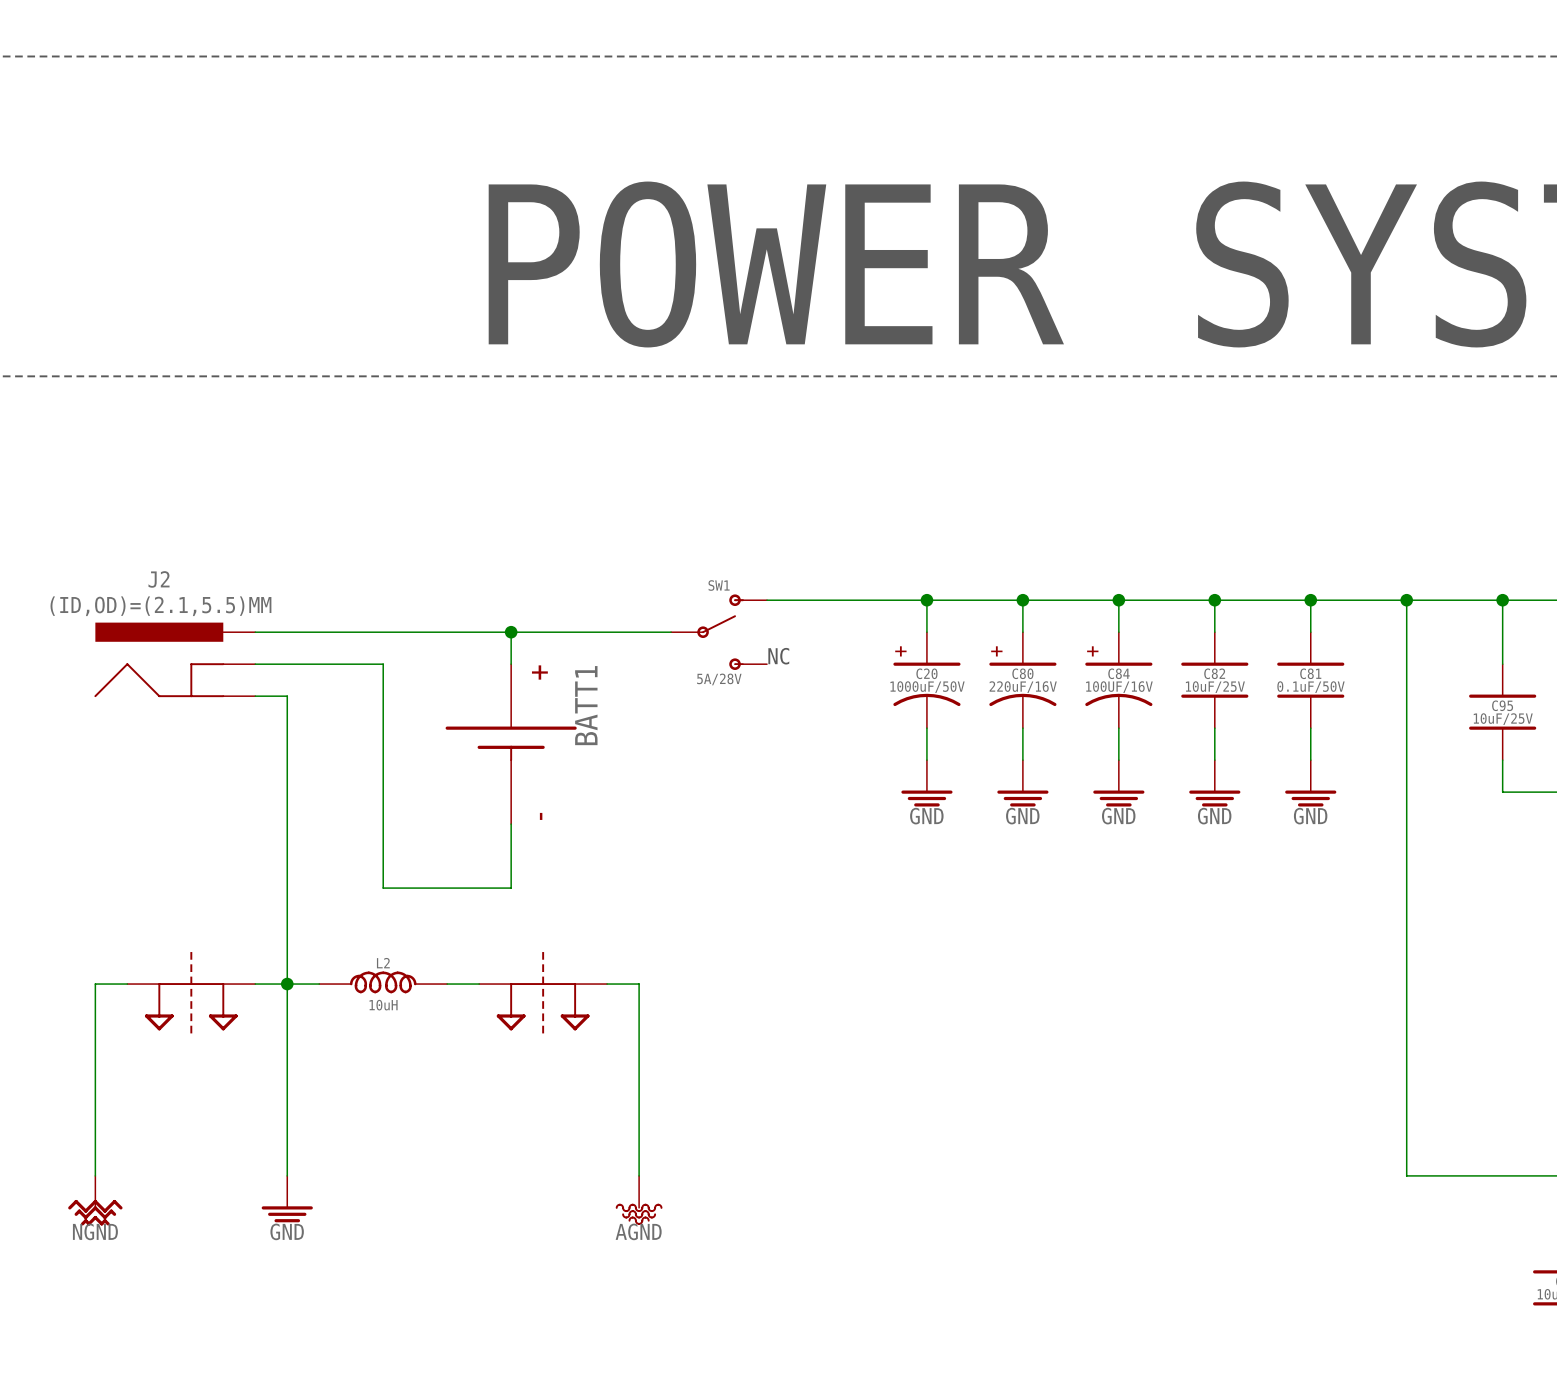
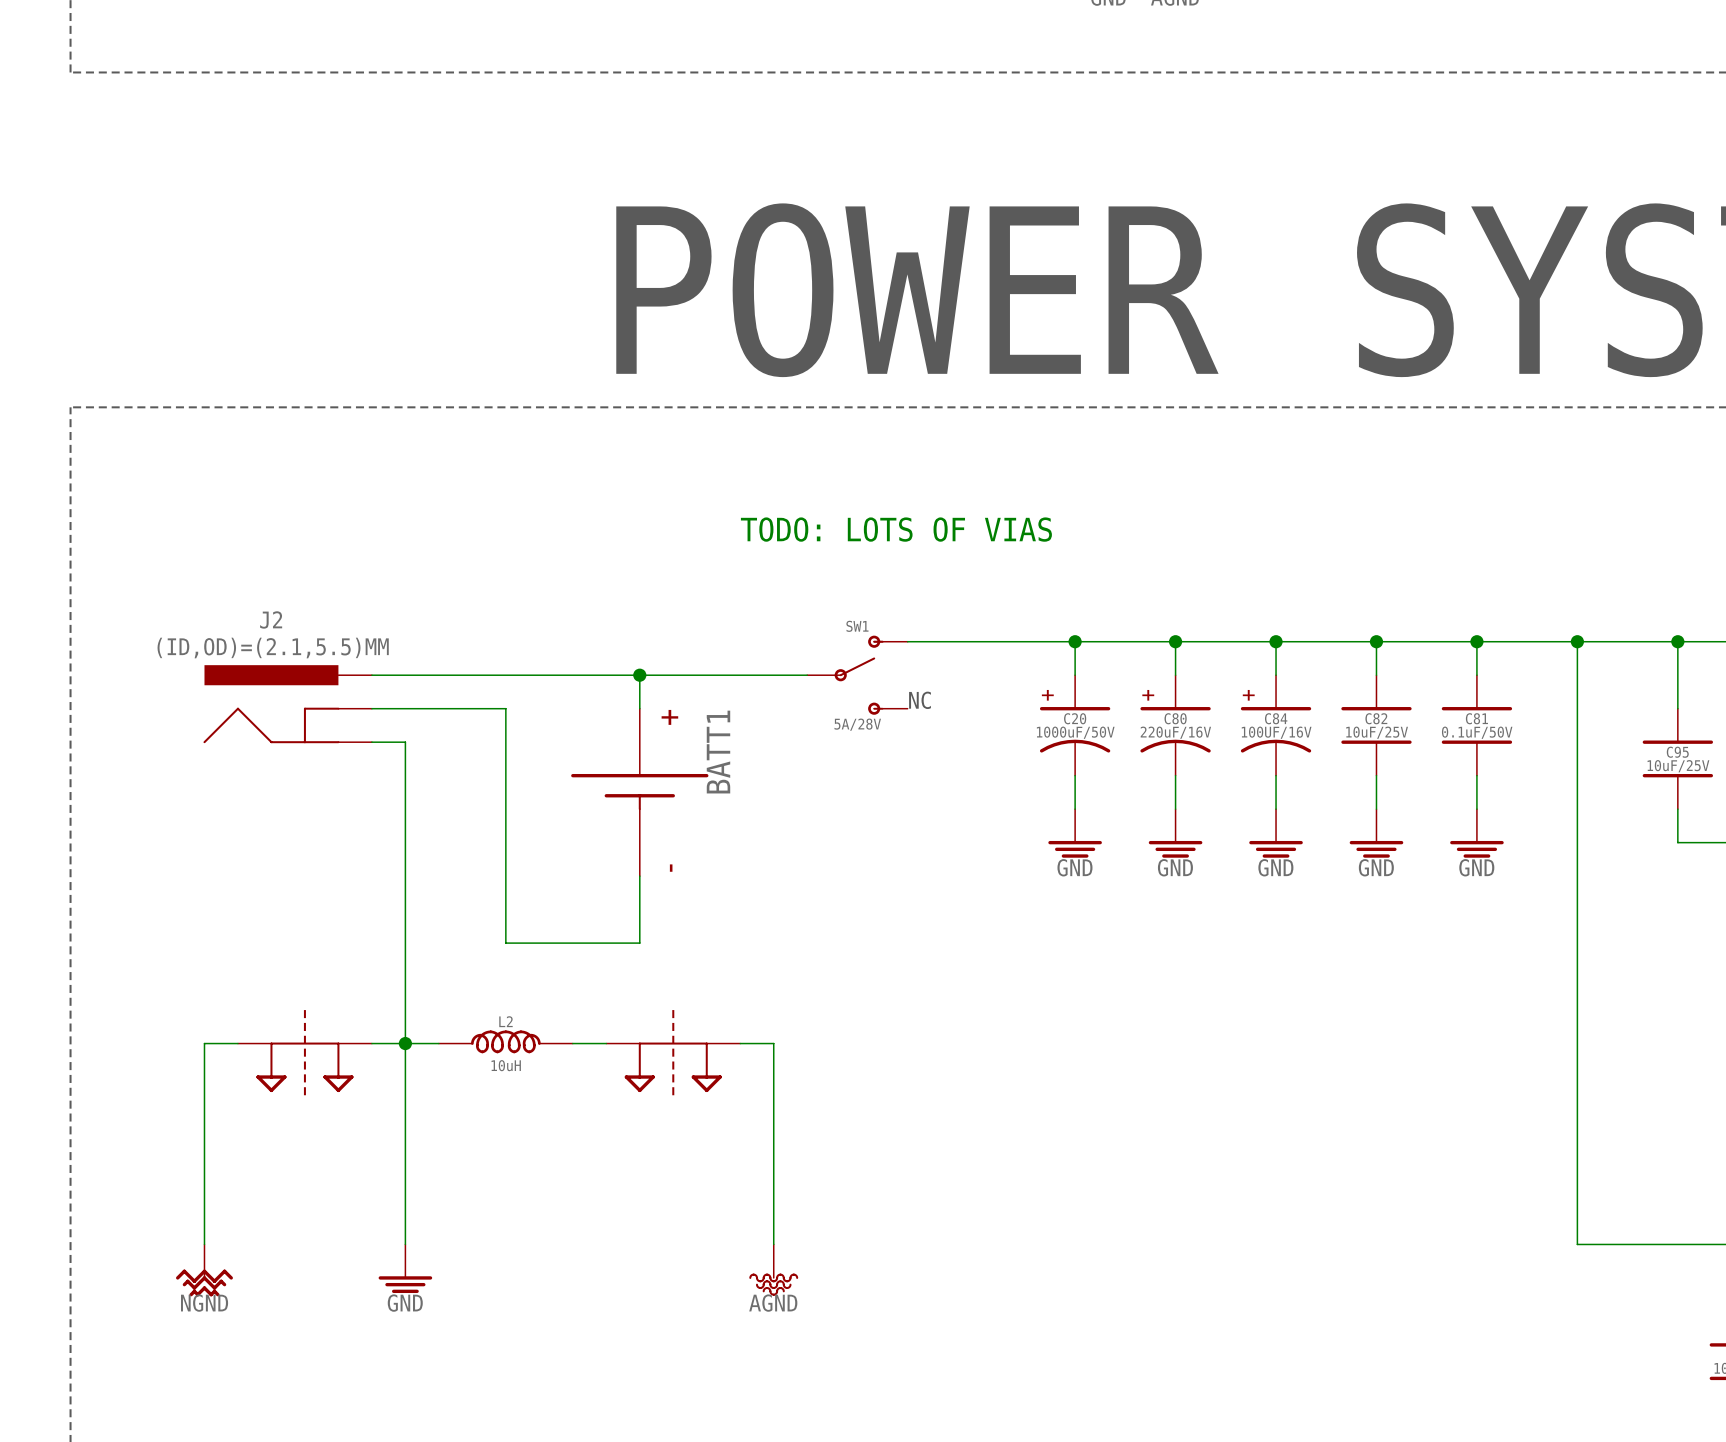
text: none -> TODO: LOTS OF VIAS (896, 529)

